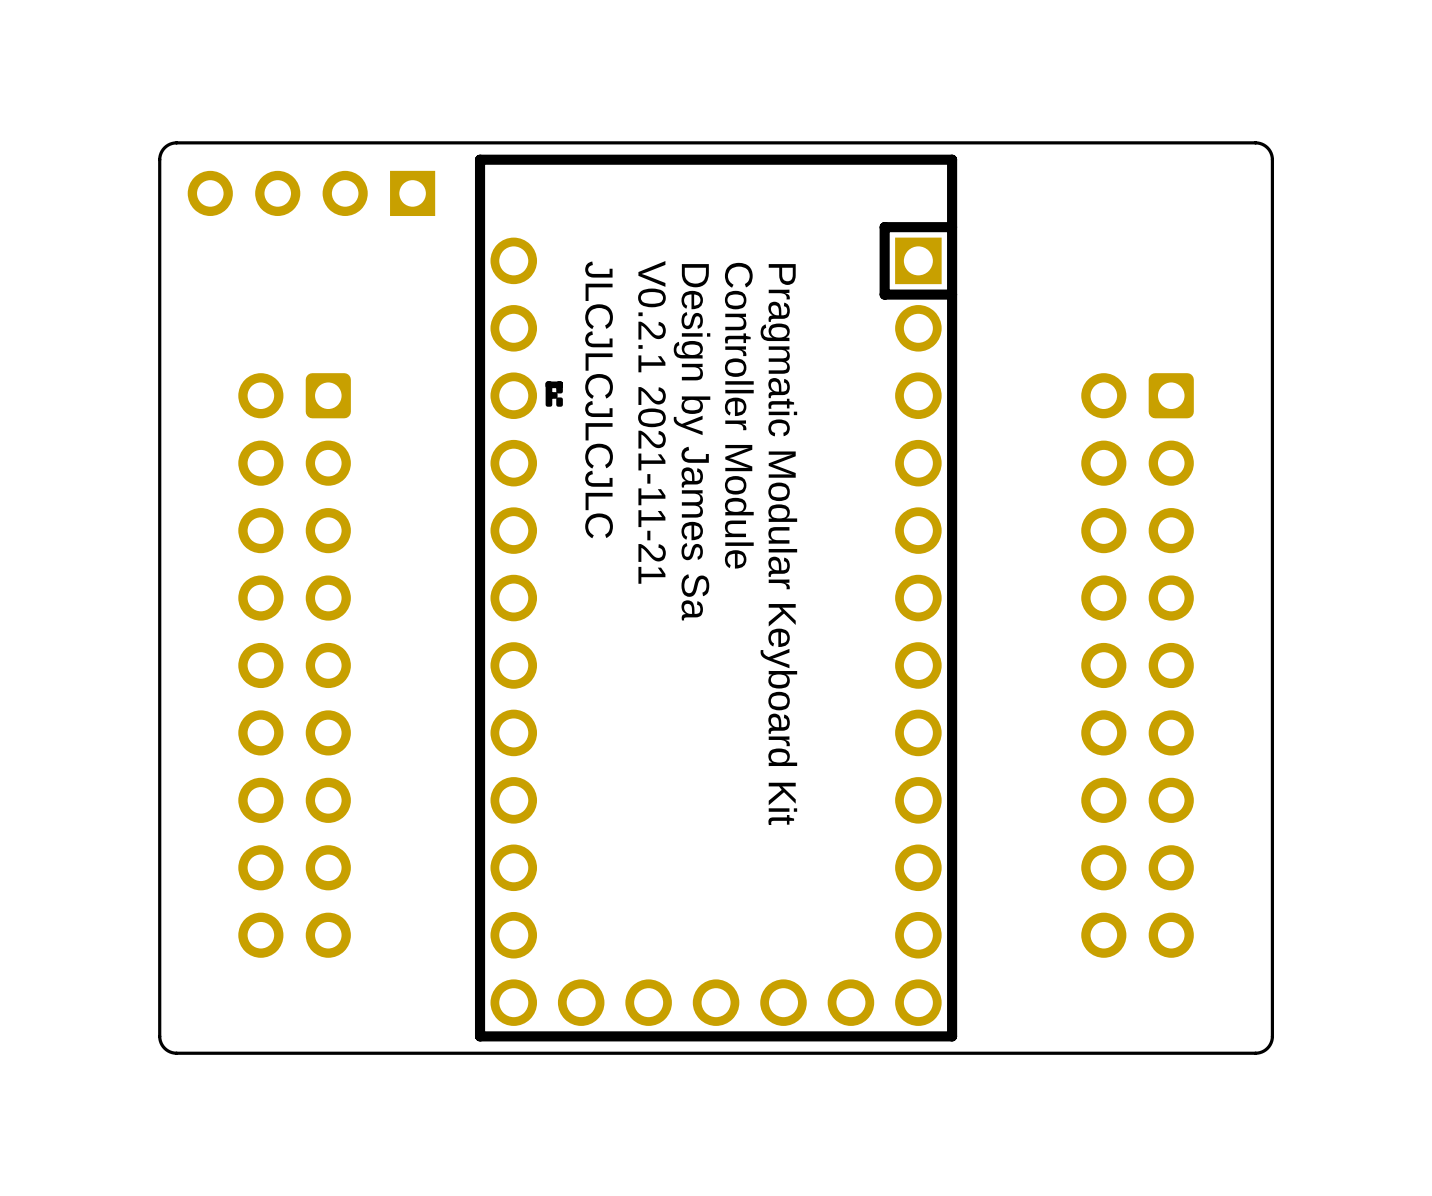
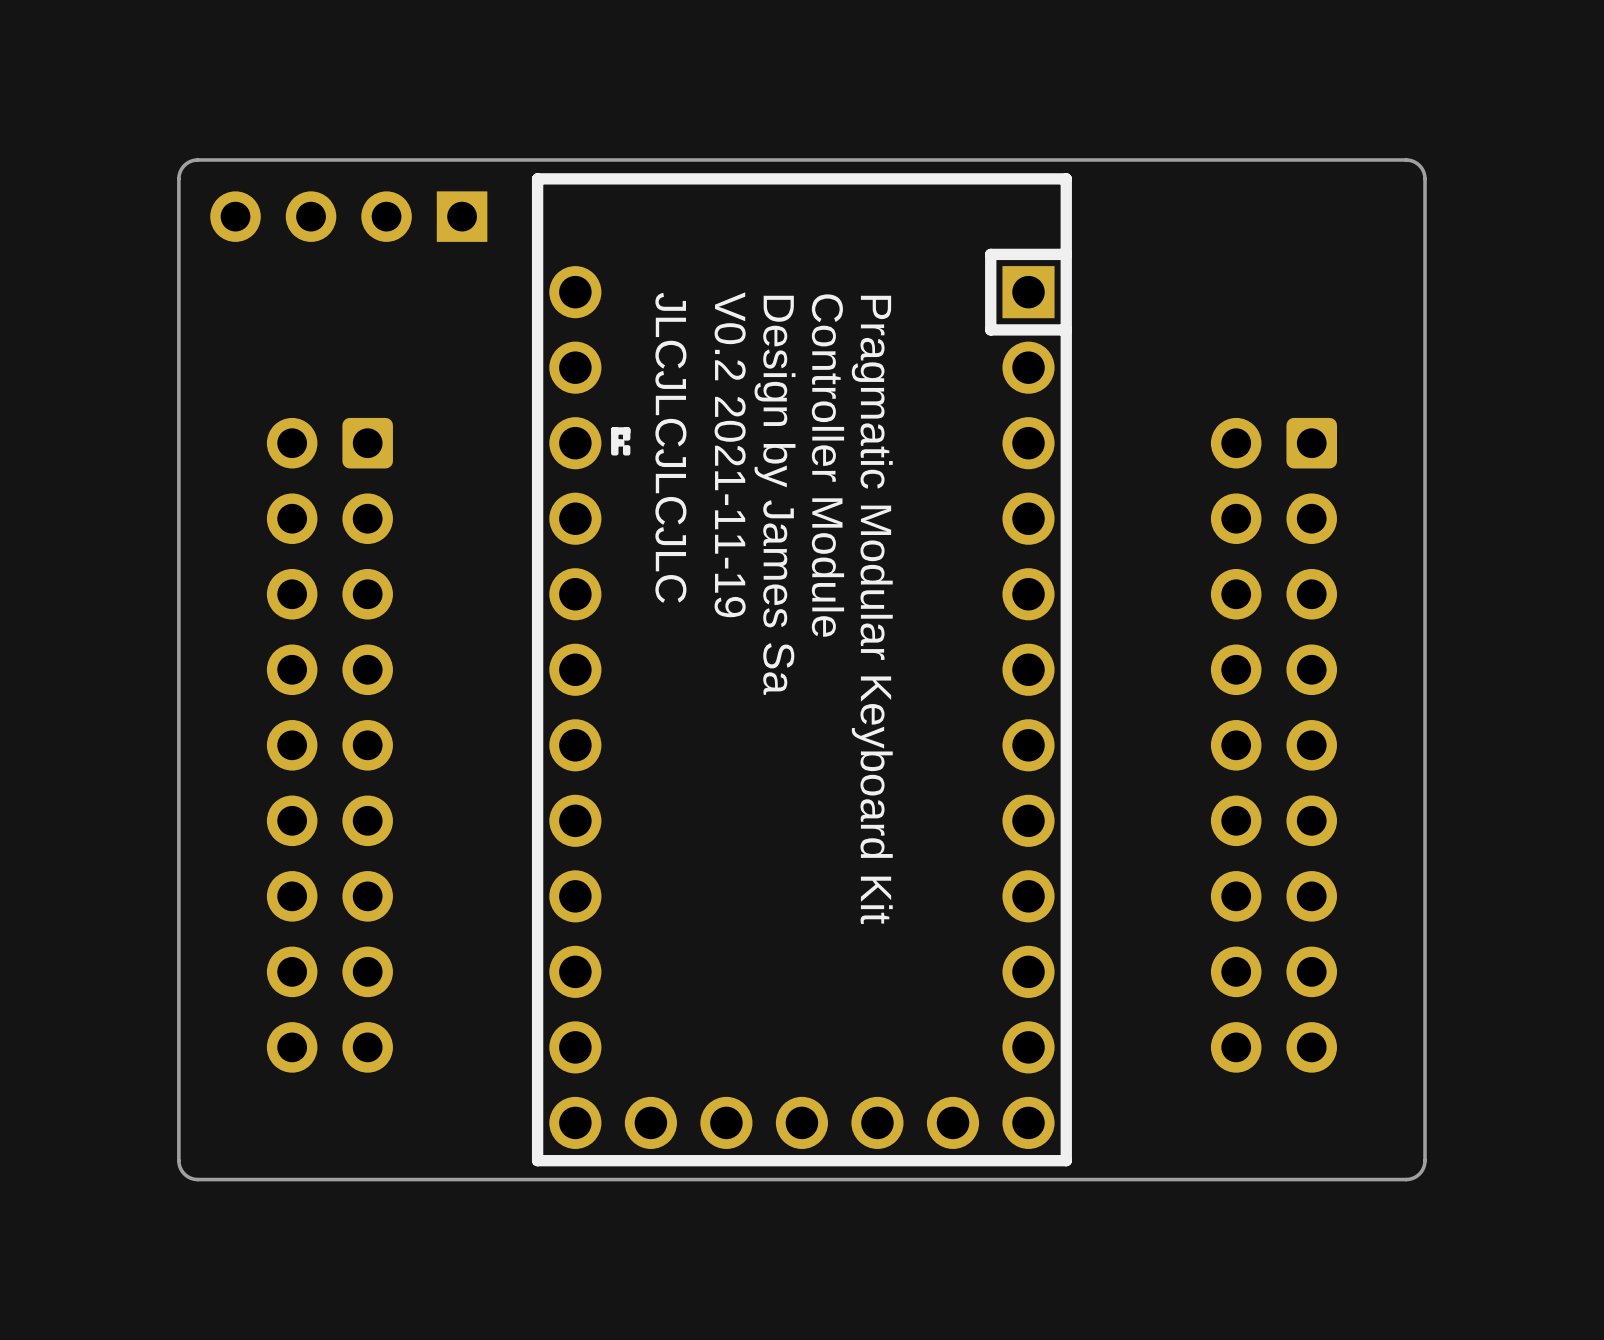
text: V0.2.1 2021-11-21 (651, 422) -> V0.2 2021-11-19 (730, 454)

